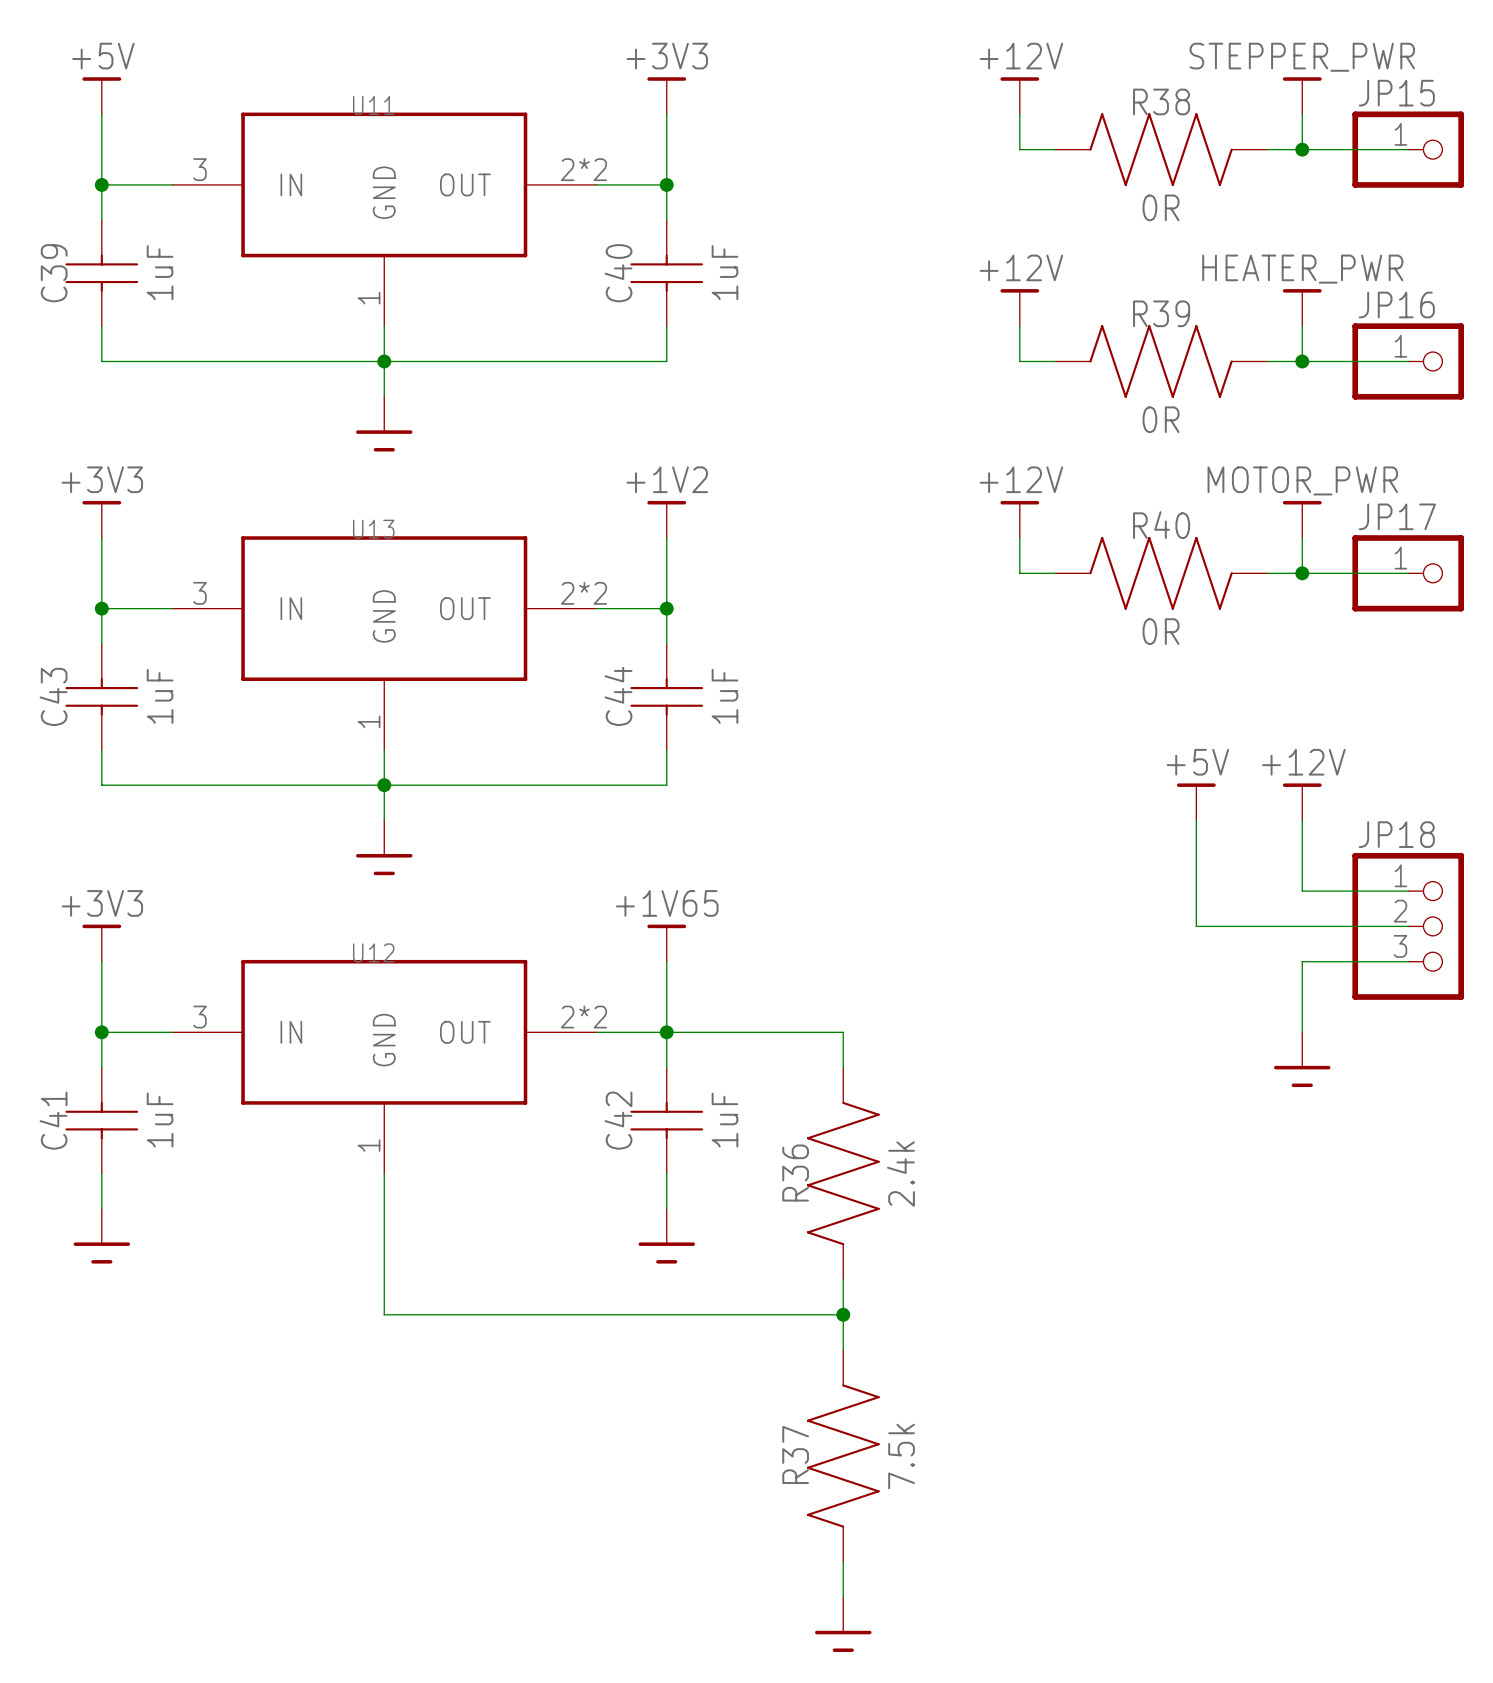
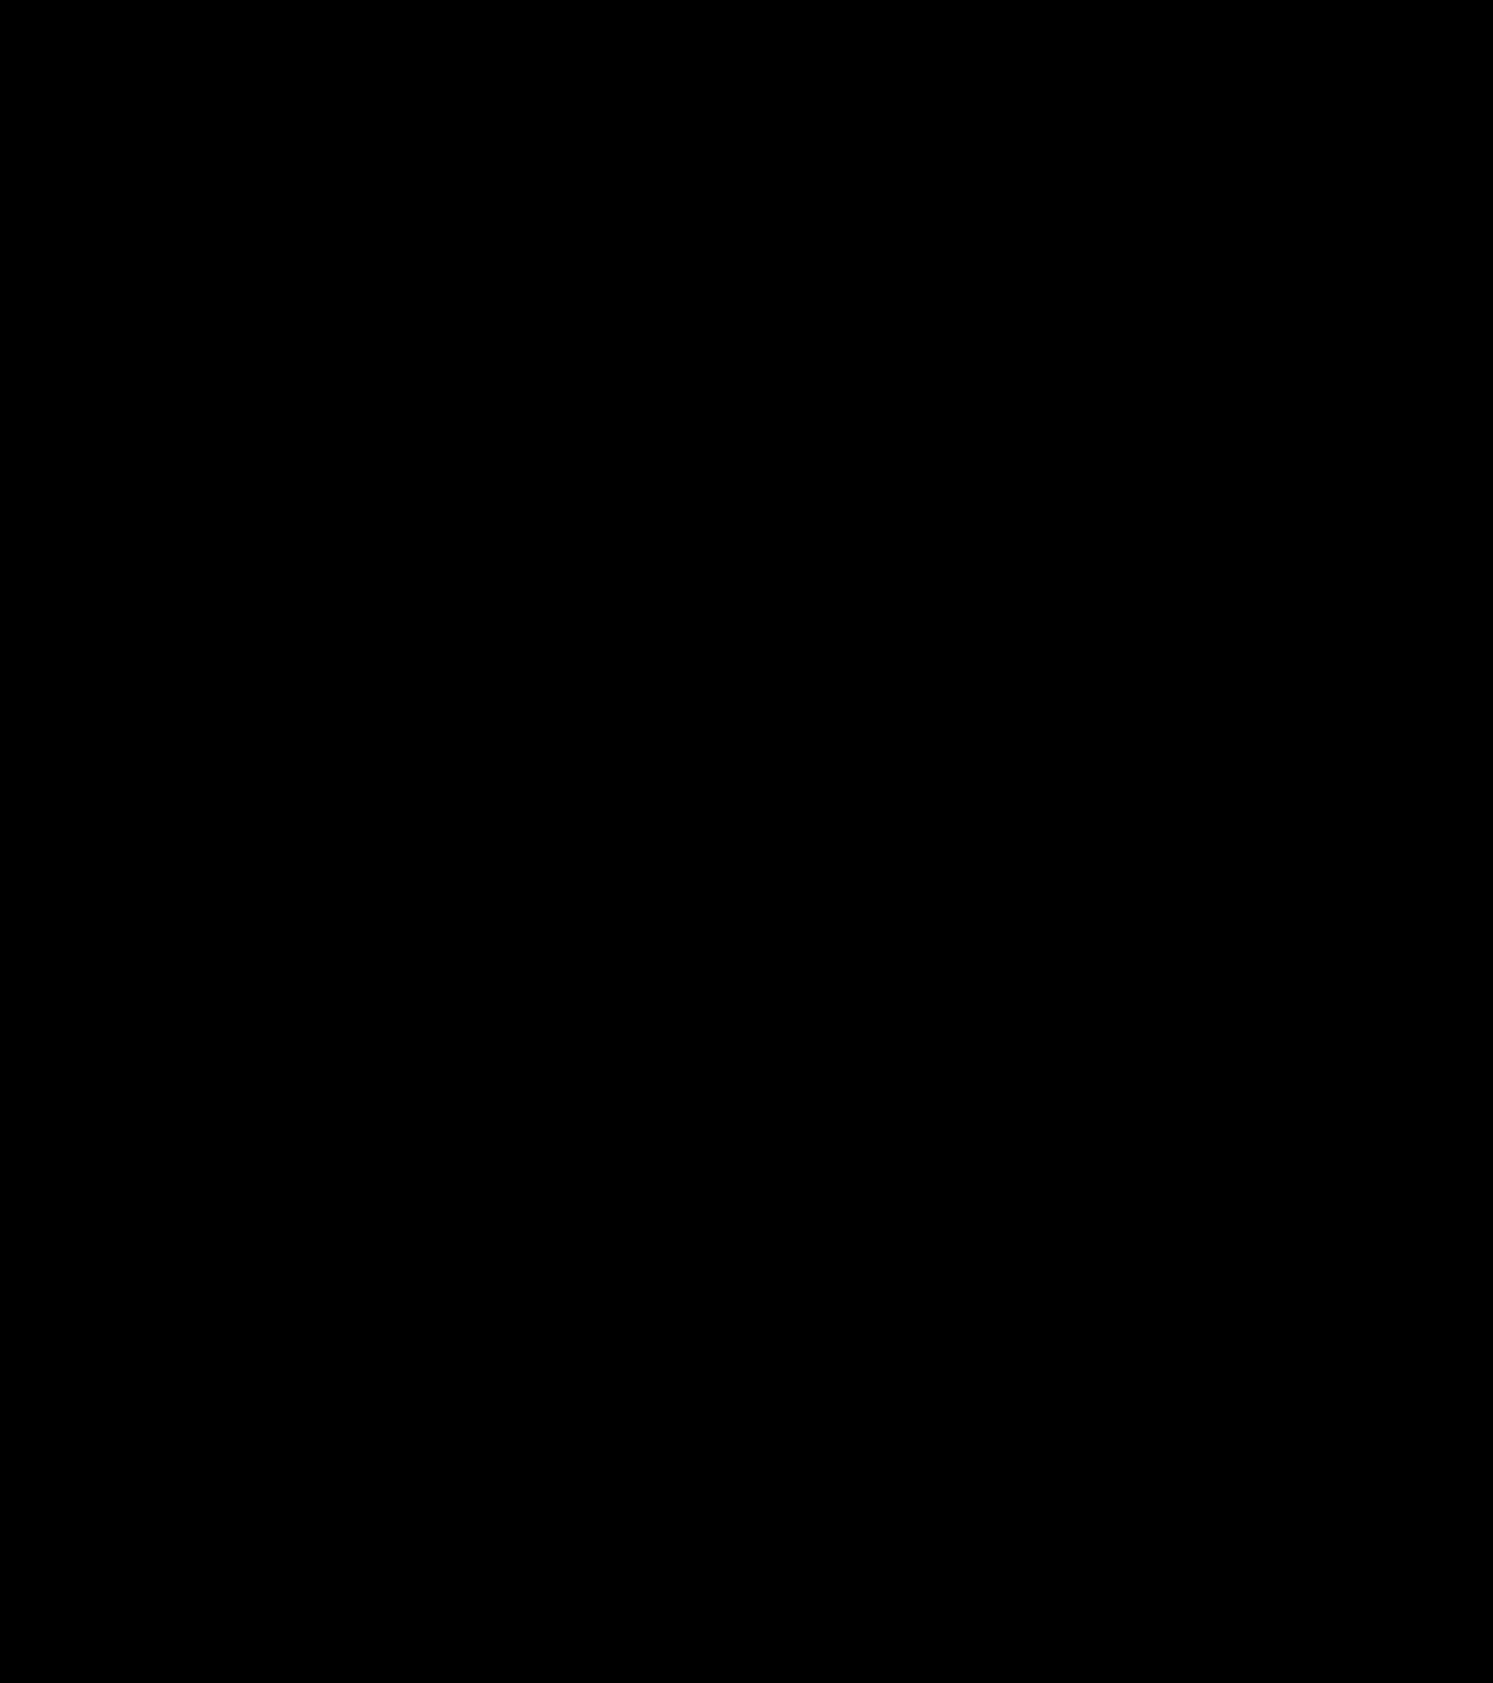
power symbol: +5V (101, 95) -> none
power symbol: +3V3 (666, 95) -> none
power symbol: +12V (1019, 95) -> none
power symbol: STEPPER_PWR (1302, 95) -> none
wire: (101, 114) (101, 220) -> none
wire: (666, 114) (666, 220) -> none
wire: (1019, 114) (1019, 149) (1055, 149) -> none
wire: (1302, 114) (1302, 149) -> none
R38: 0R (1161, 149) -> none
wire: (1266, 149) (1408, 149) -> none
junction: (1302, 149) -> none
JP15: (1408, 149) -> none
wire: (101, 184) (172, 184) -> none
junction: (101, 184) -> none
wire: (596, 184) (666, 184) -> none
junction: (666, 184) -> none
U11: (384, 219) -> none
C39: 1uF (101, 273) -> none
C40: 1uF (666, 273) -> none
power symbol: +12V (1019, 307) -> none
power symbol: HEATER_PWR (1302, 307) -> none
wire: (101, 326) (101, 361) (666, 361) (666, 326) -> none
wire: (384, 326) (384, 396) -> none
wire: (1019, 326) (1019, 361) (1055, 361) -> none
wire: (1302, 326) (1302, 361) -> none
junction: (384, 361) -> none
R39: 0R (1161, 361) -> none
wire: (1266, 361) (1408, 361) -> none
junction: (1302, 361) -> none
JP16: (1408, 361) -> none
power symbol: (384, 424) -> none
power symbol: +3V3 (101, 519) -> none
power symbol: +1V2 (666, 519) -> none
power symbol: +12V (1019, 519) -> none
power symbol: MOTOR_PWR (1302, 519) -> none
wire: (101, 538) (101, 643) -> none
wire: (666, 538) (666, 643) -> none
wire: (1019, 538) (1019, 573) (1055, 573) -> none
wire: (1302, 538) (1302, 573) -> none
R40: 0R (1161, 573) -> none
wire: (1266, 573) (1408, 573) -> none
junction: (1302, 573) -> none
JP17: (1408, 573) -> none
wire: (101, 608) (172, 608) -> none
junction: (101, 608) -> none
wire: (596, 608) (666, 608) -> none
junction: (666, 608) -> none
U13: (384, 643) -> none
C43: 1uF (101, 696) -> none
C44: 1uF (666, 696) -> none
wire: (101, 749) (101, 785) (666, 785) (666, 749) -> none
wire: (384, 749) (384, 820) -> none
junction: (384, 785) -> none
power symbol: +5V (1196, 801) -> none
power symbol: +12V (1302, 801) -> none
wire: (1196, 820) (1196, 926) (1408, 926) -> none
wire: (1302, 820) (1302, 891) (1408, 891) -> none
power symbol: (384, 847) -> none
JP18: (1408, 926) -> none
power symbol: +3V3 (101, 943) -> none
power symbol: +1V65 (666, 943) -> none
wire: (101, 961) (101, 1067) -> none
wire: (666, 961) (666, 1067) -> none
wire: (1408, 961) (1302, 961) (1302, 1032) -> none
wire: (101, 1032) (172, 1032) -> none
junction: (101, 1032) -> none
wire: (596, 1032) (843, 1032) (843, 1067) -> none
junction: (666, 1032) -> none
power symbol: (1302, 1059) -> none
U12: (384, 1066) -> none
C41: 1uF (101, 1120) -> none
C42: 1uF (666, 1120) -> none
wire: (101, 1173) (101, 1208) -> none
wire: (384, 1173) (384, 1314) (843, 1314) -> none
wire: (666, 1173) (666, 1208) -> none
R36: 2.4k (843, 1173) -> none
power symbol: (101, 1236) -> none
power symbol: (666, 1236) -> none
wire: (843, 1279) (843, 1350) -> none
junction: (843, 1314) -> none
R37: 7.5k (843, 1456) -> none
wire: (843, 1561) (843, 1597) -> none
power symbol: (843, 1624) -> none

